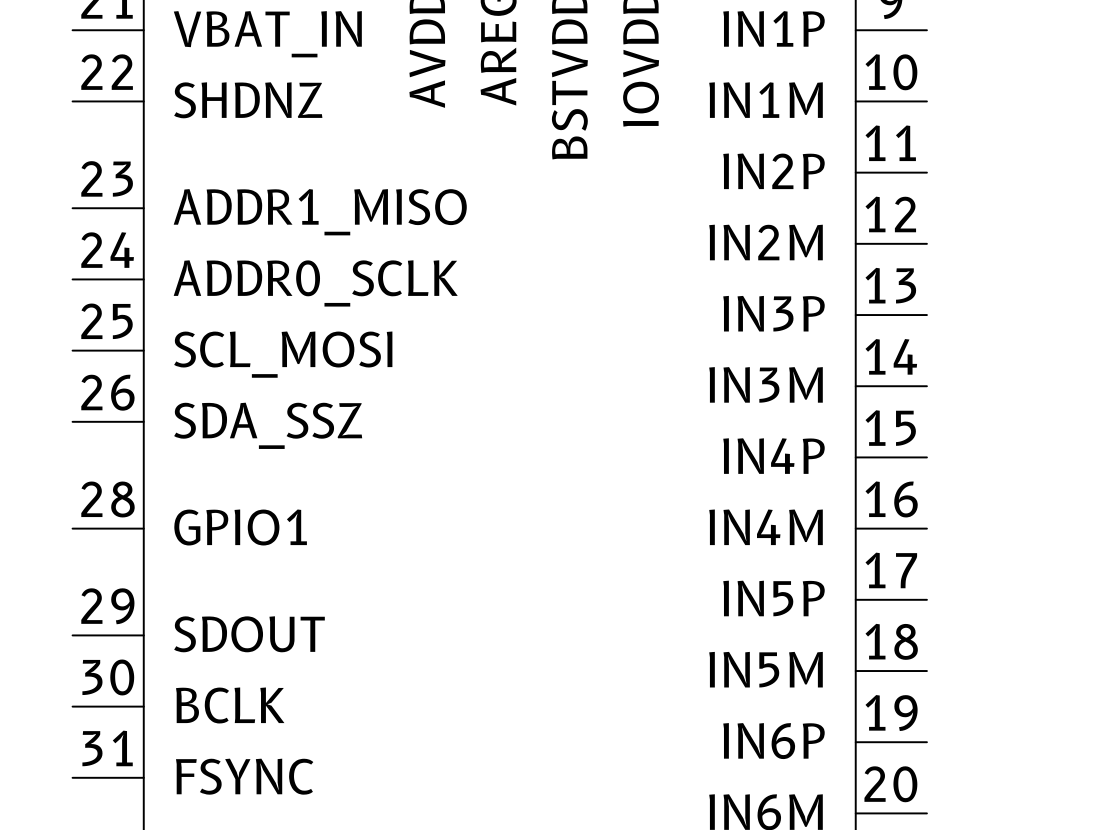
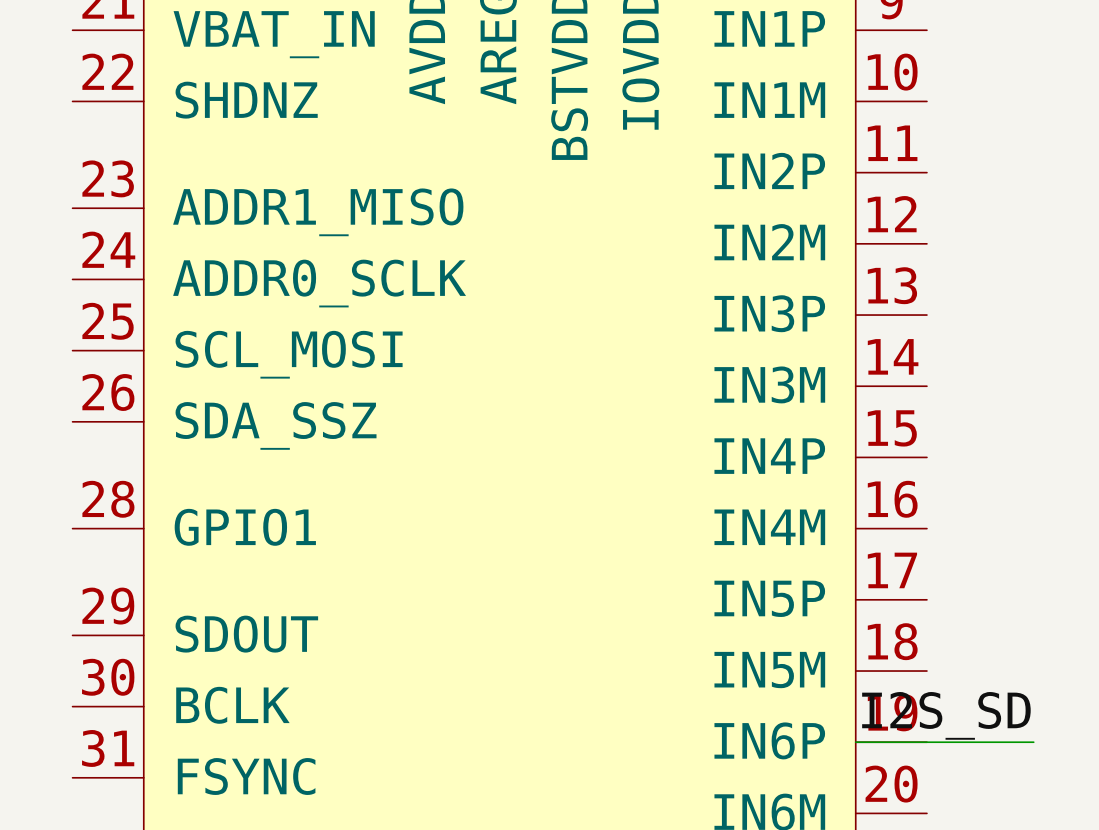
label: none -> I2S_SD (946, 715)
wire: none -> (855, 742) (1033, 742)

